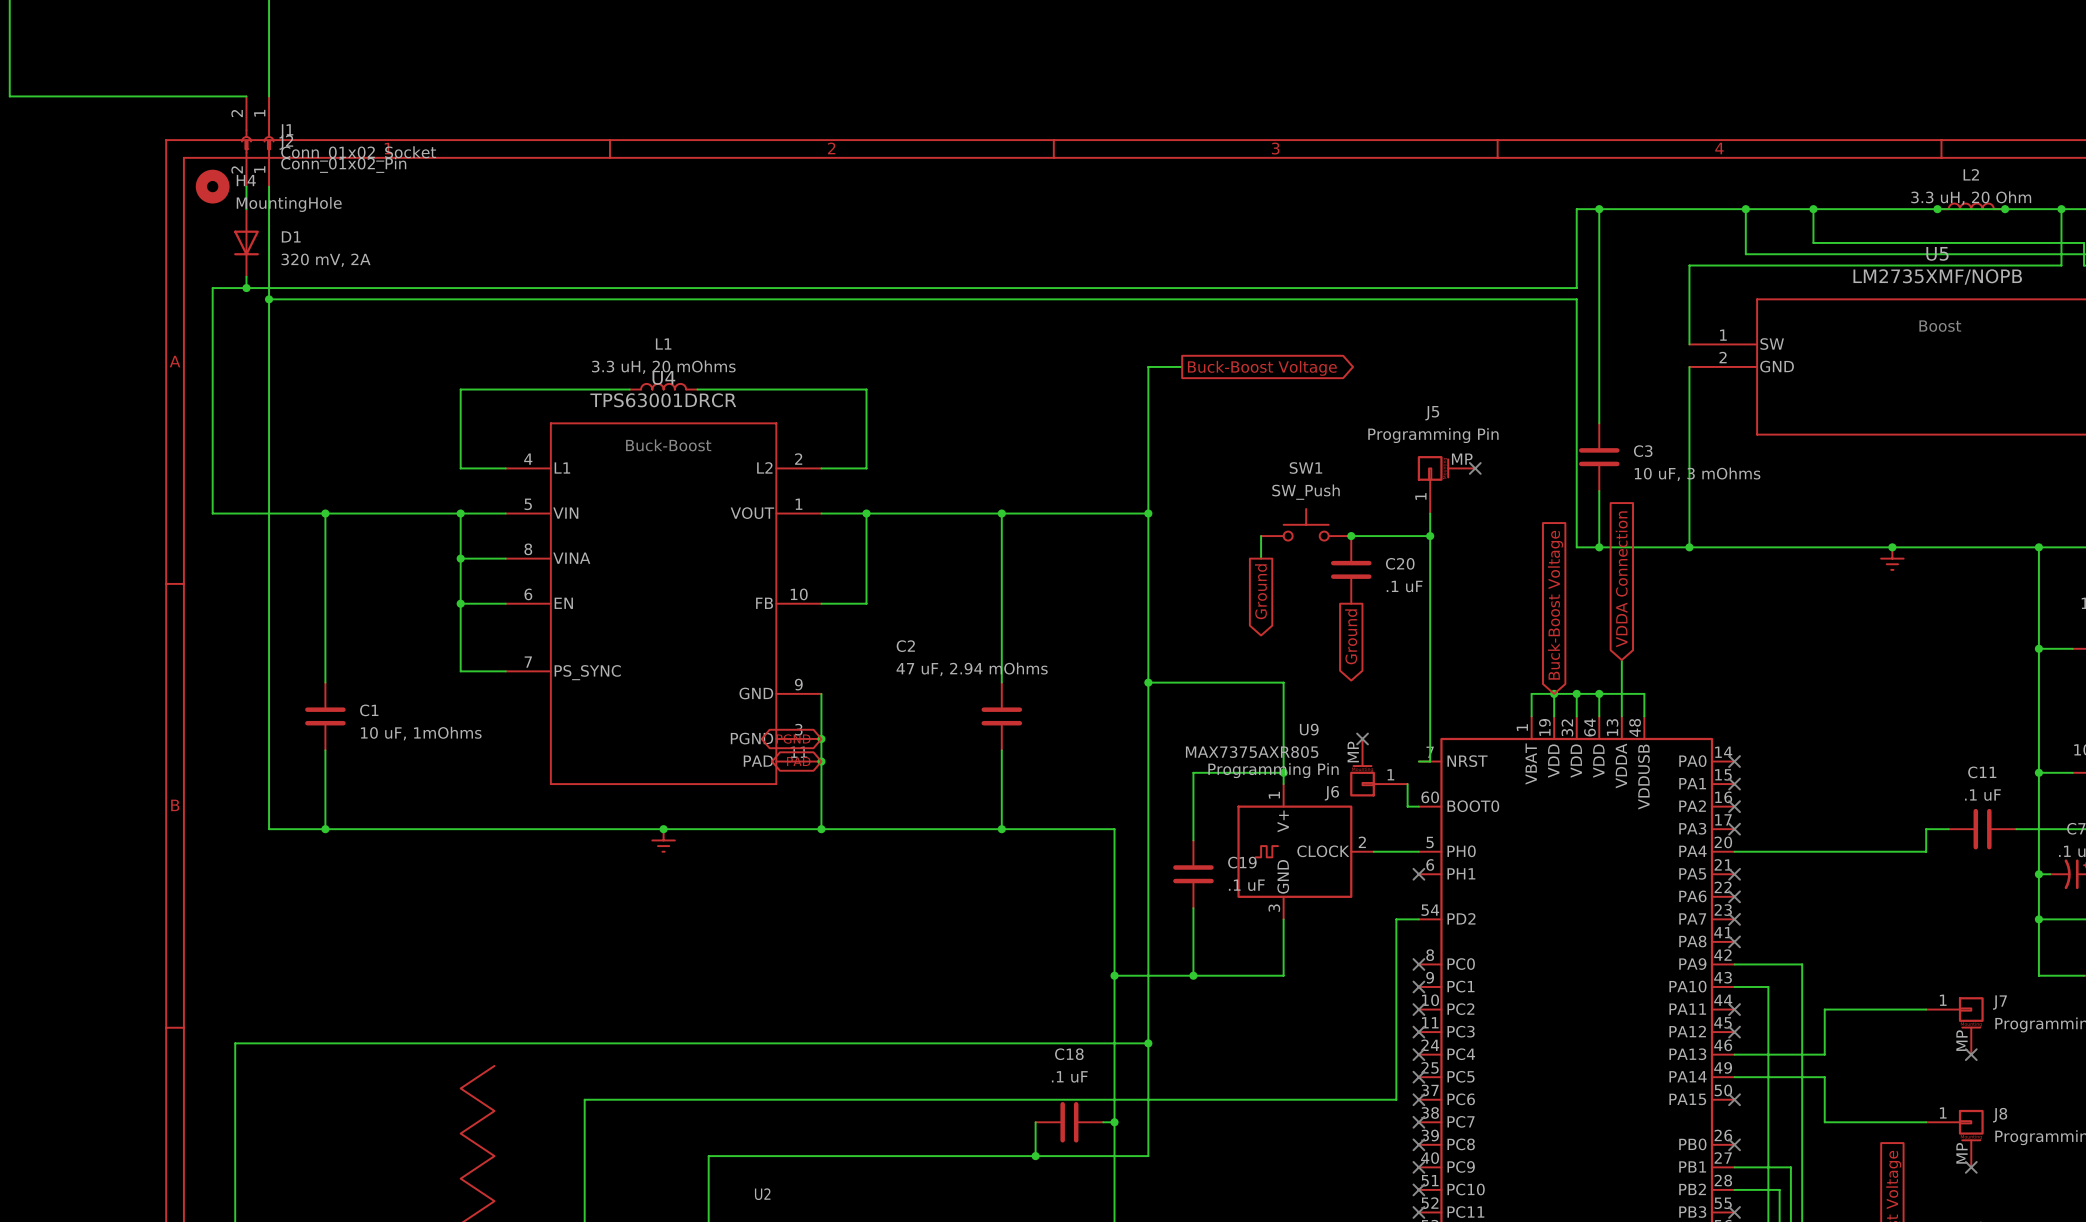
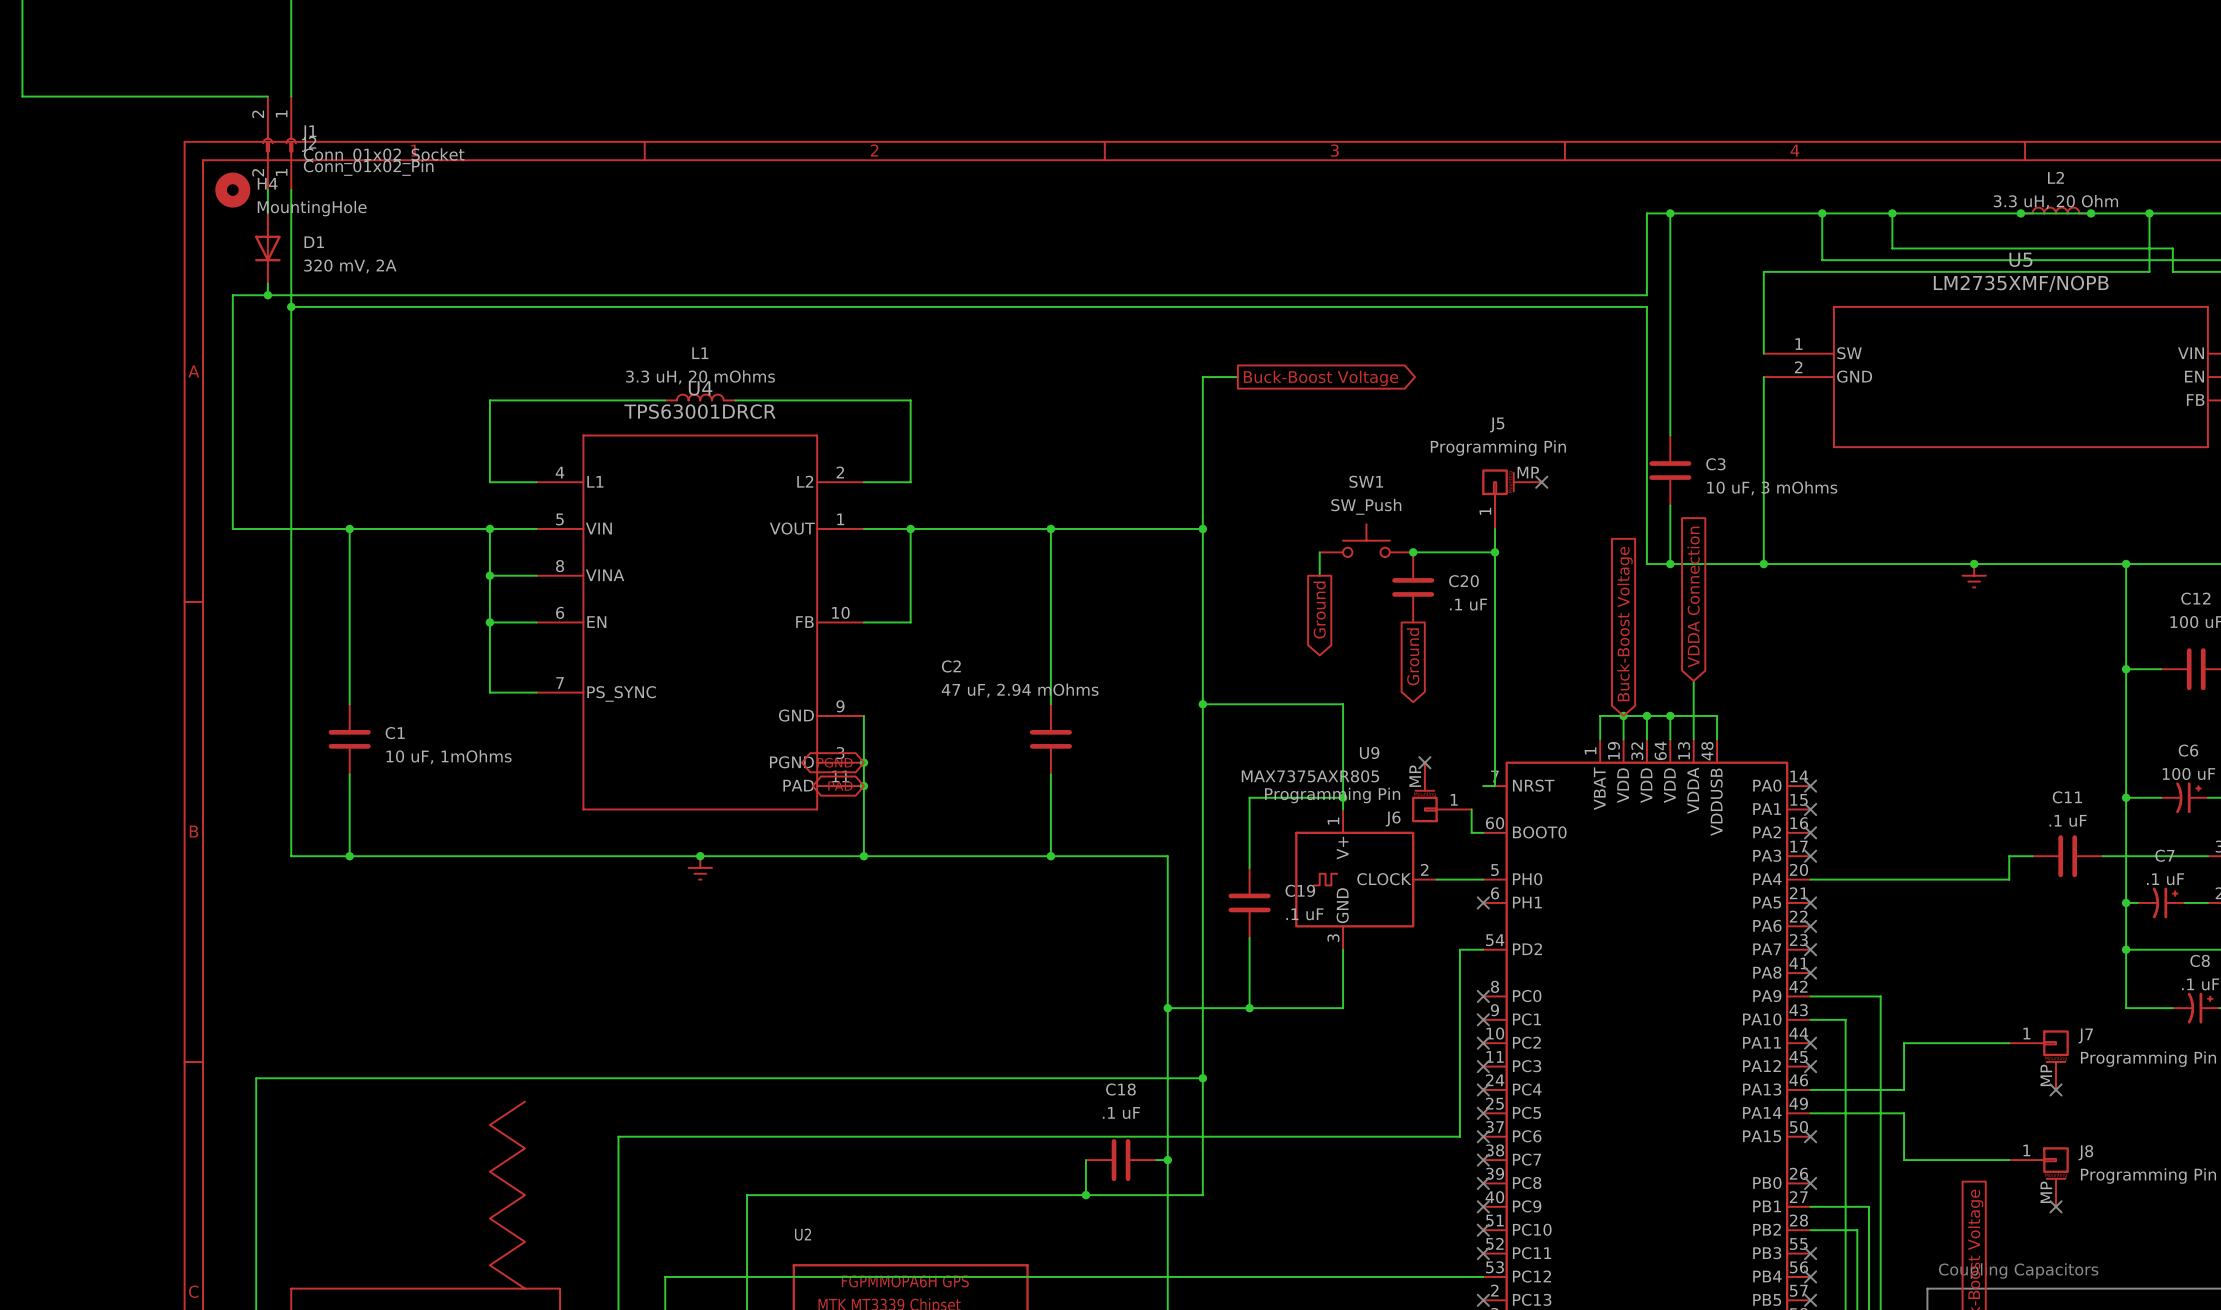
text: Boost (1940, 326) -> none
text: Buck-Boost (668, 445) -> none

